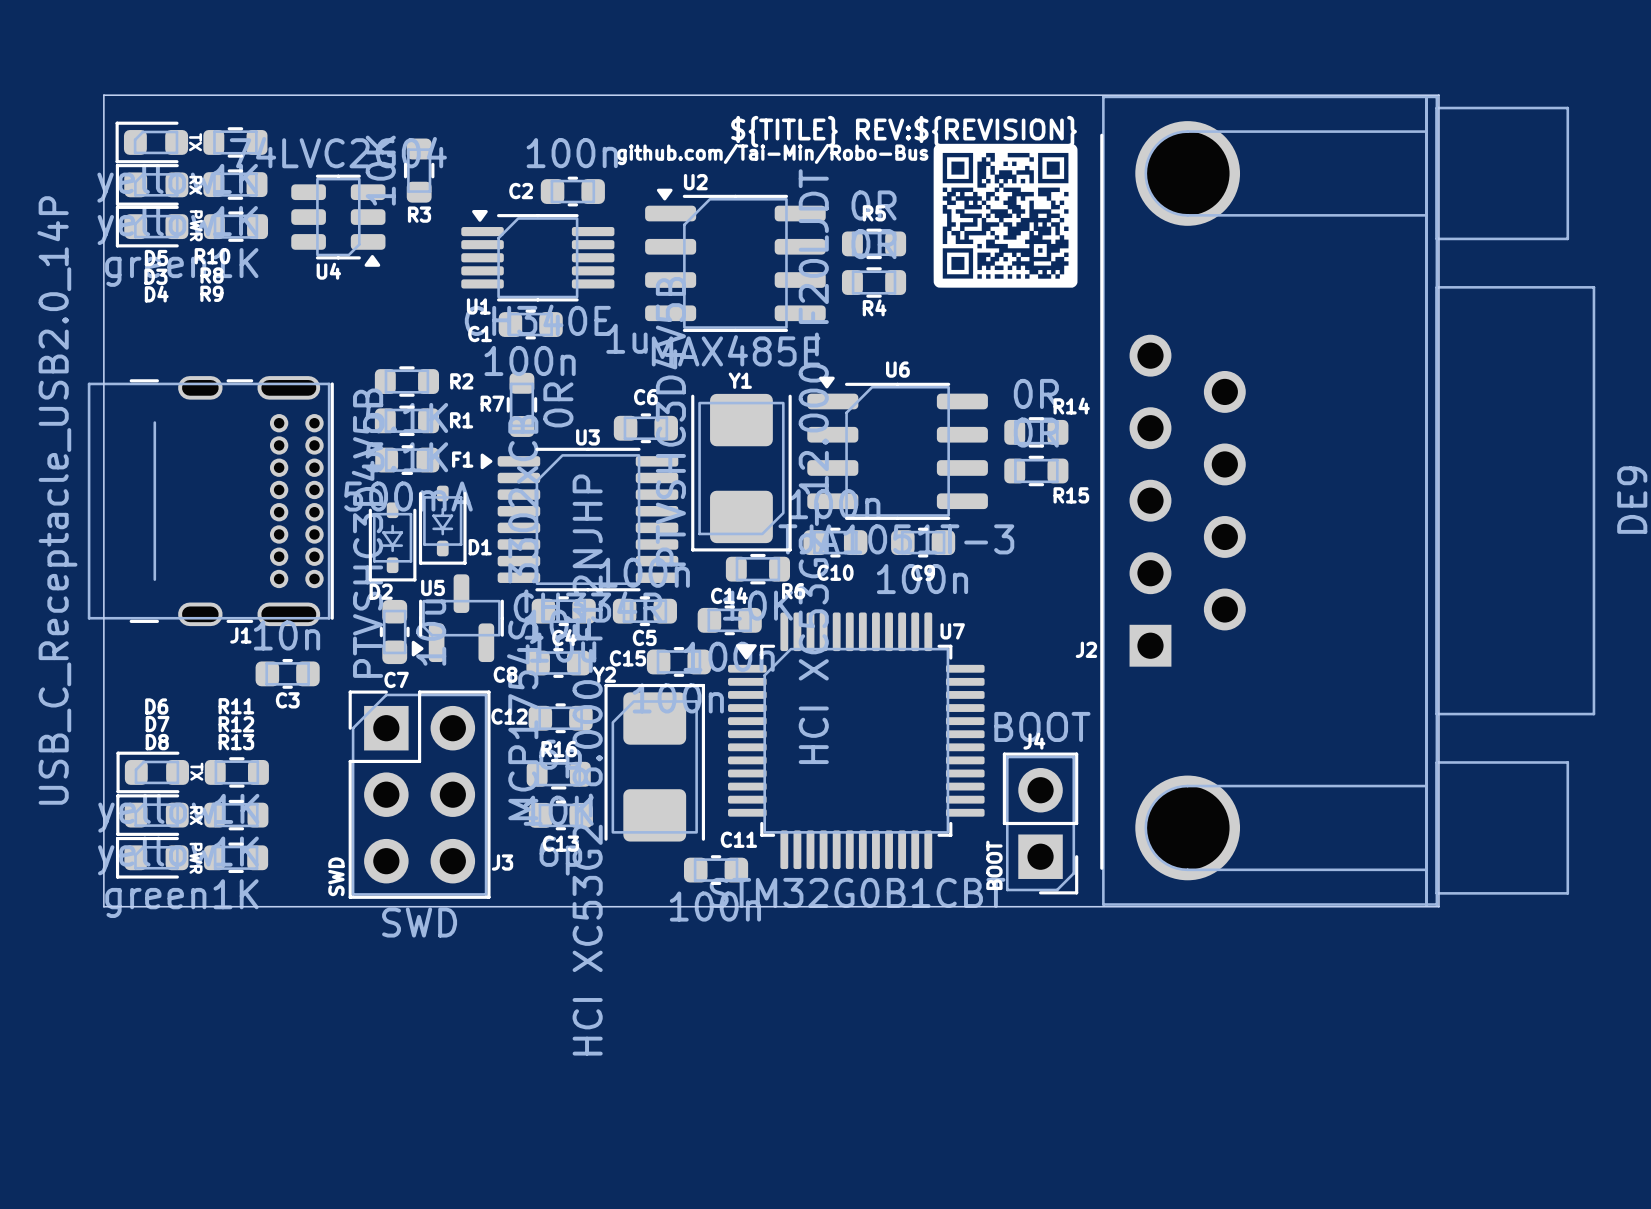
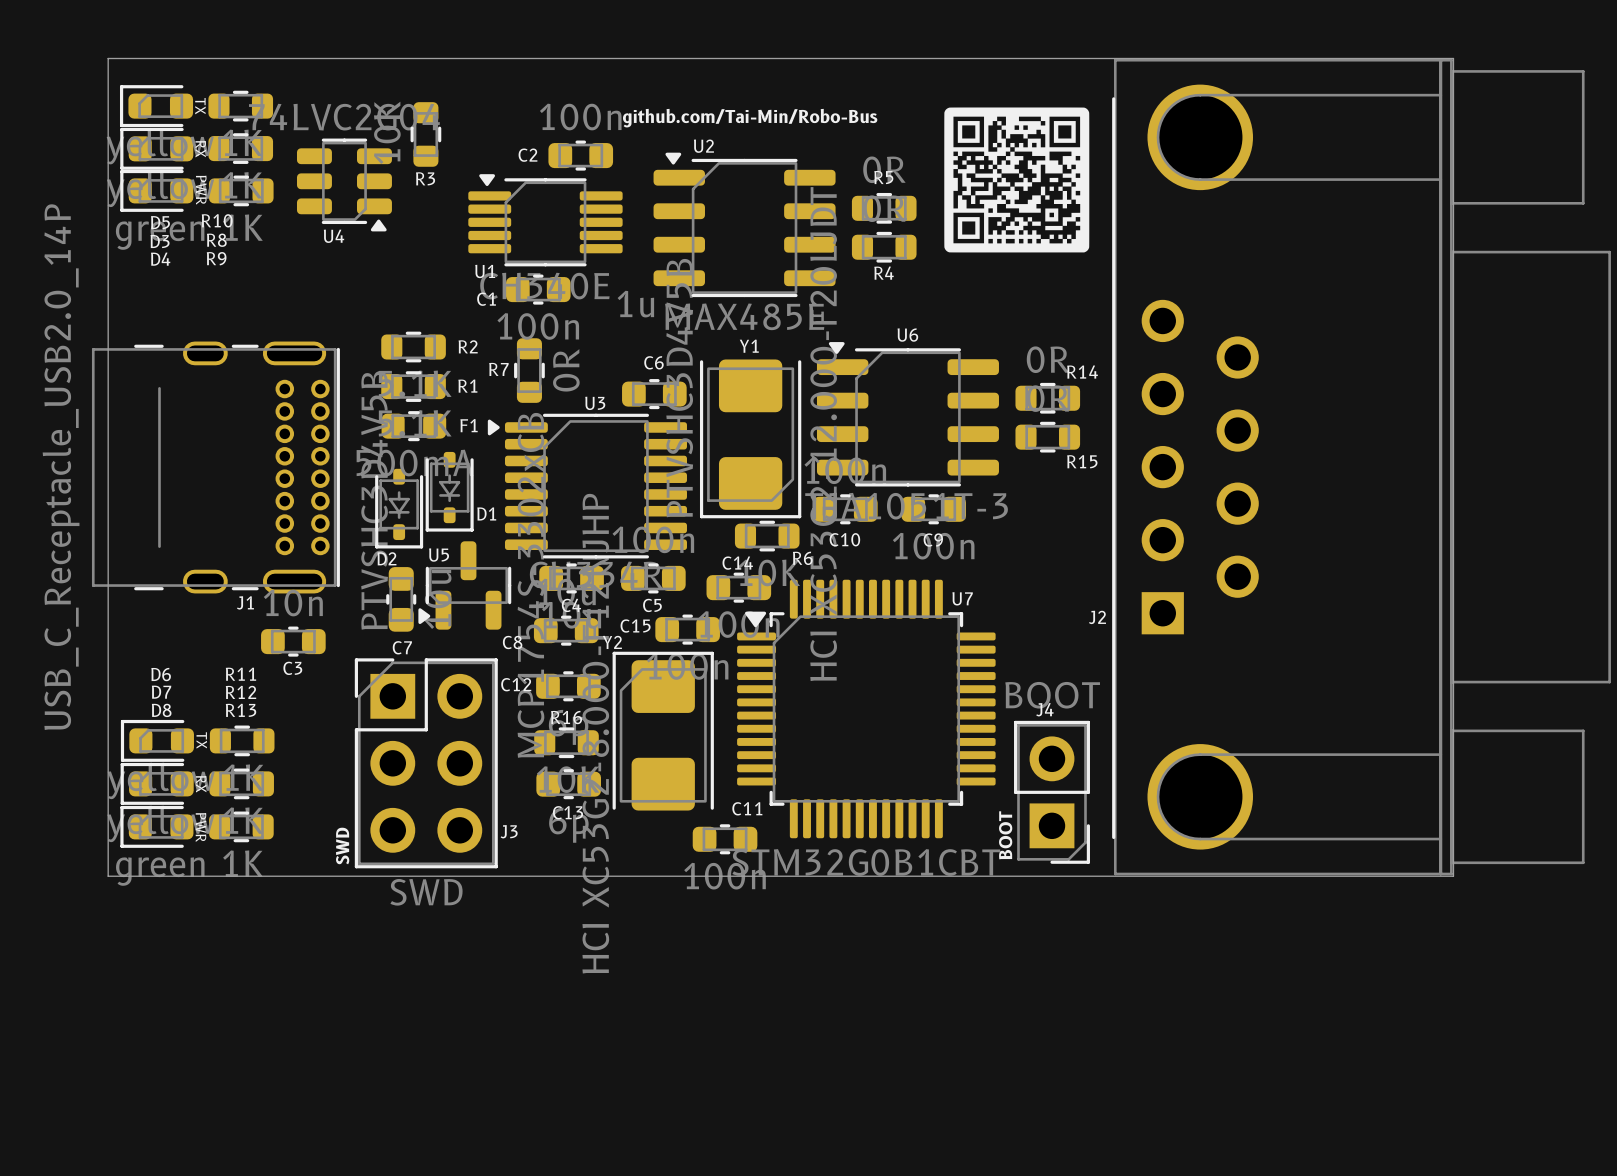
text: ${TITLE} REV:${REVISION} (904, 131) -> none

